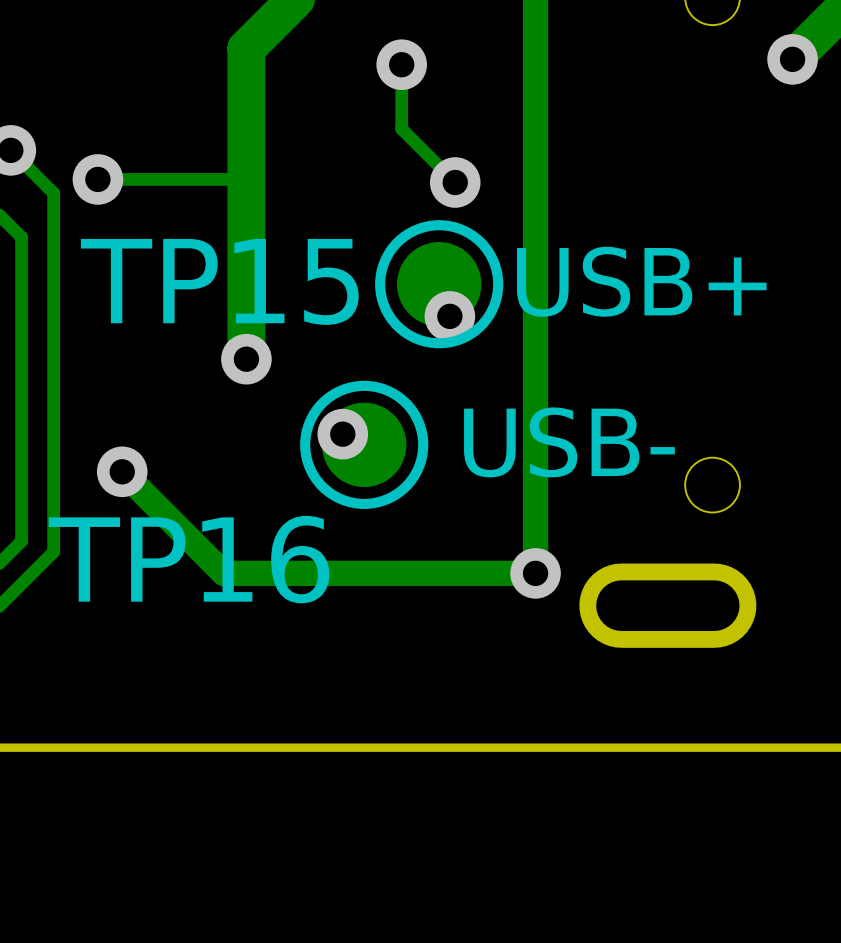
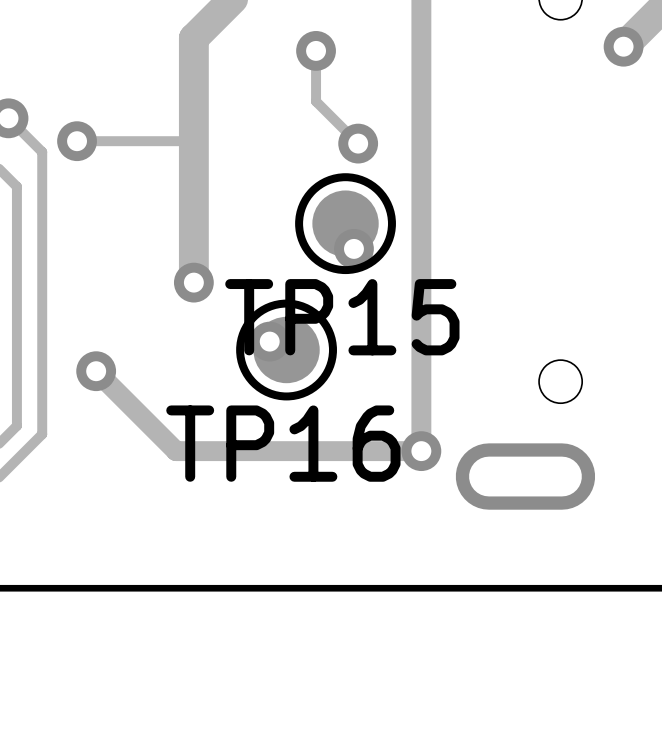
TP15 name position: TP15 (219, 281) -> TP15 (342, 317)
text: USB+ (641, 281) -> none
text: USB- (569, 442) -> none
TP16 name position: TP16 (189, 559) -> TP16 (283, 443)

